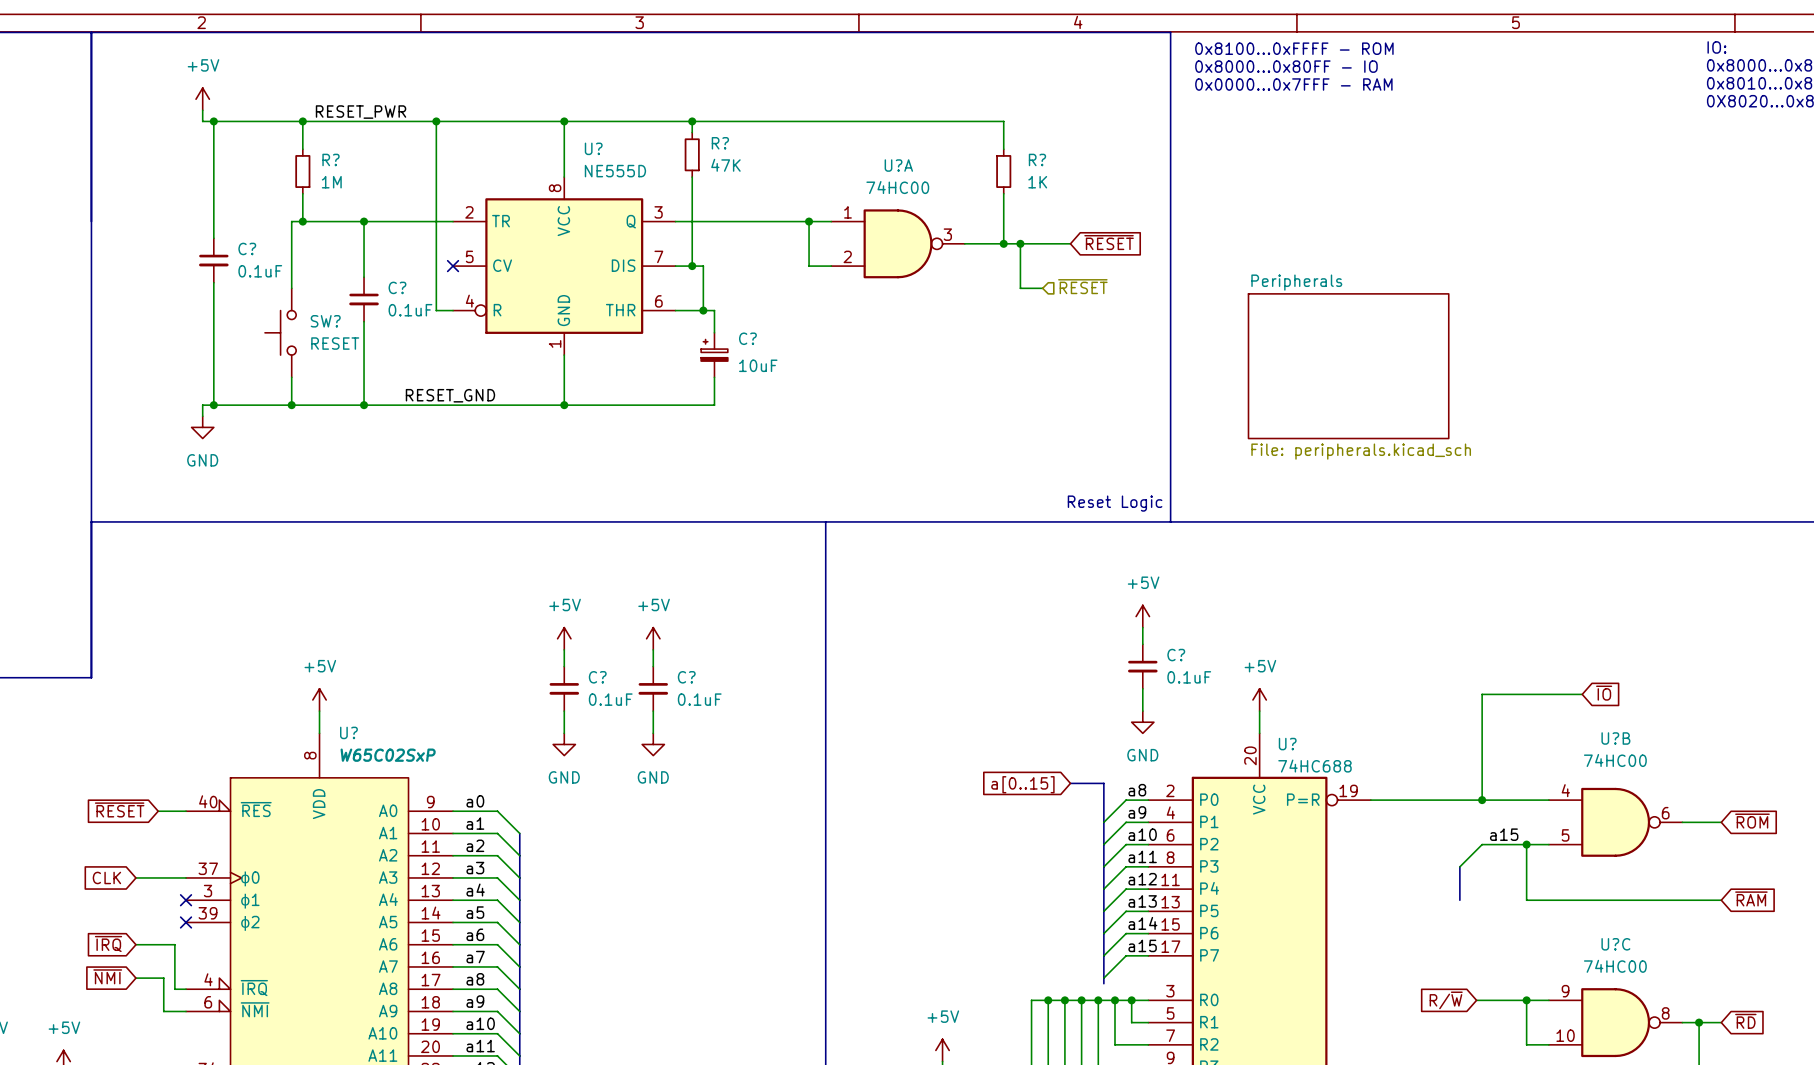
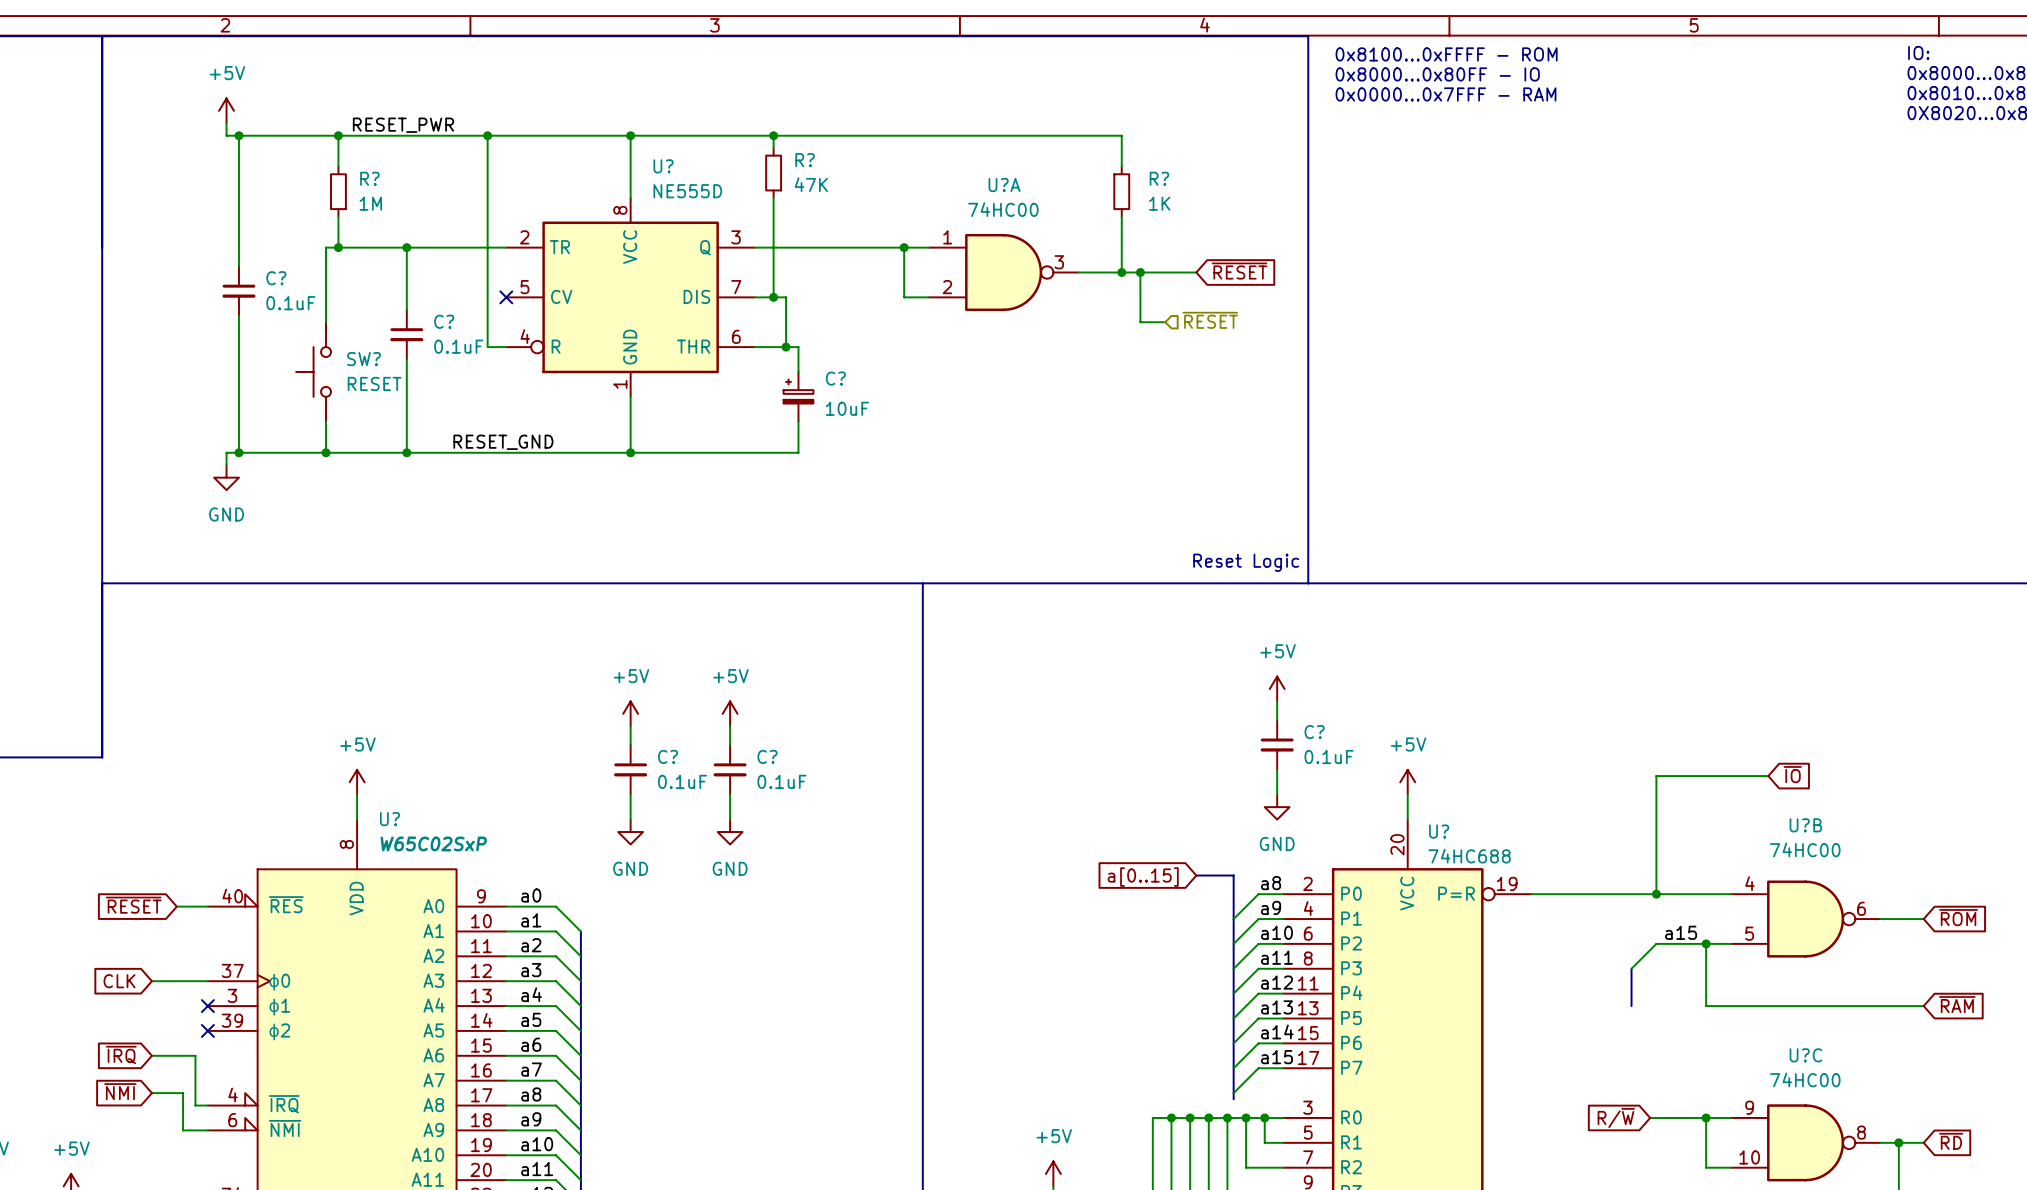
sheet Peripherals: File: peripherals.kicad_sch (1348, 366) -> none

